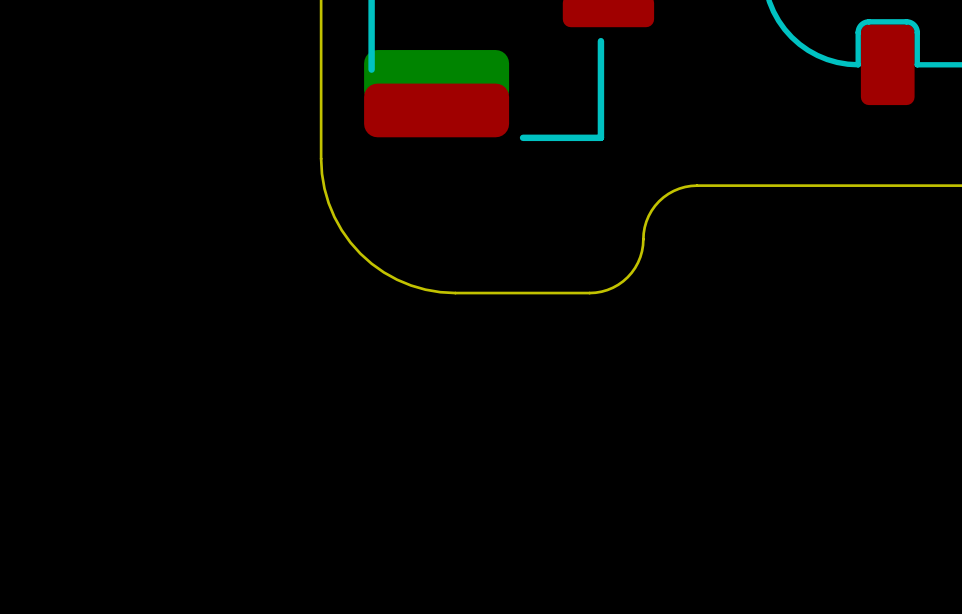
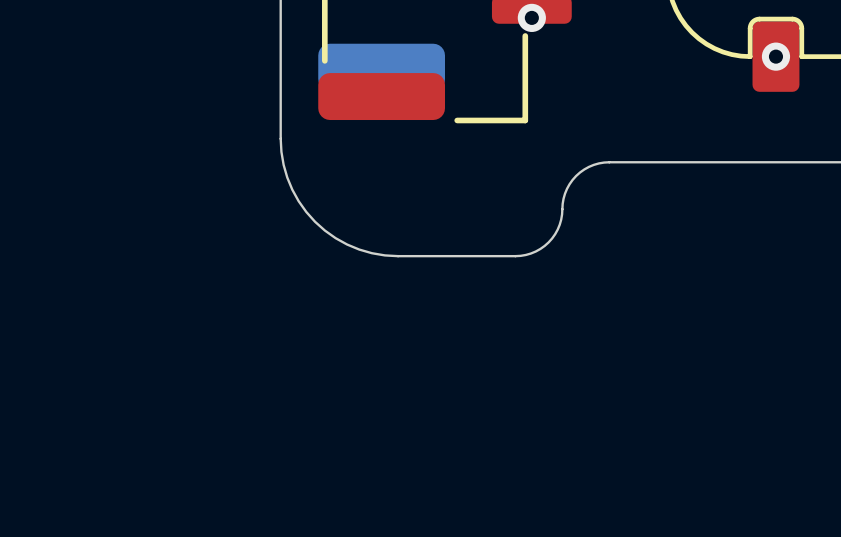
via: none -> (531, 17)
via: none -> (775, 56)

